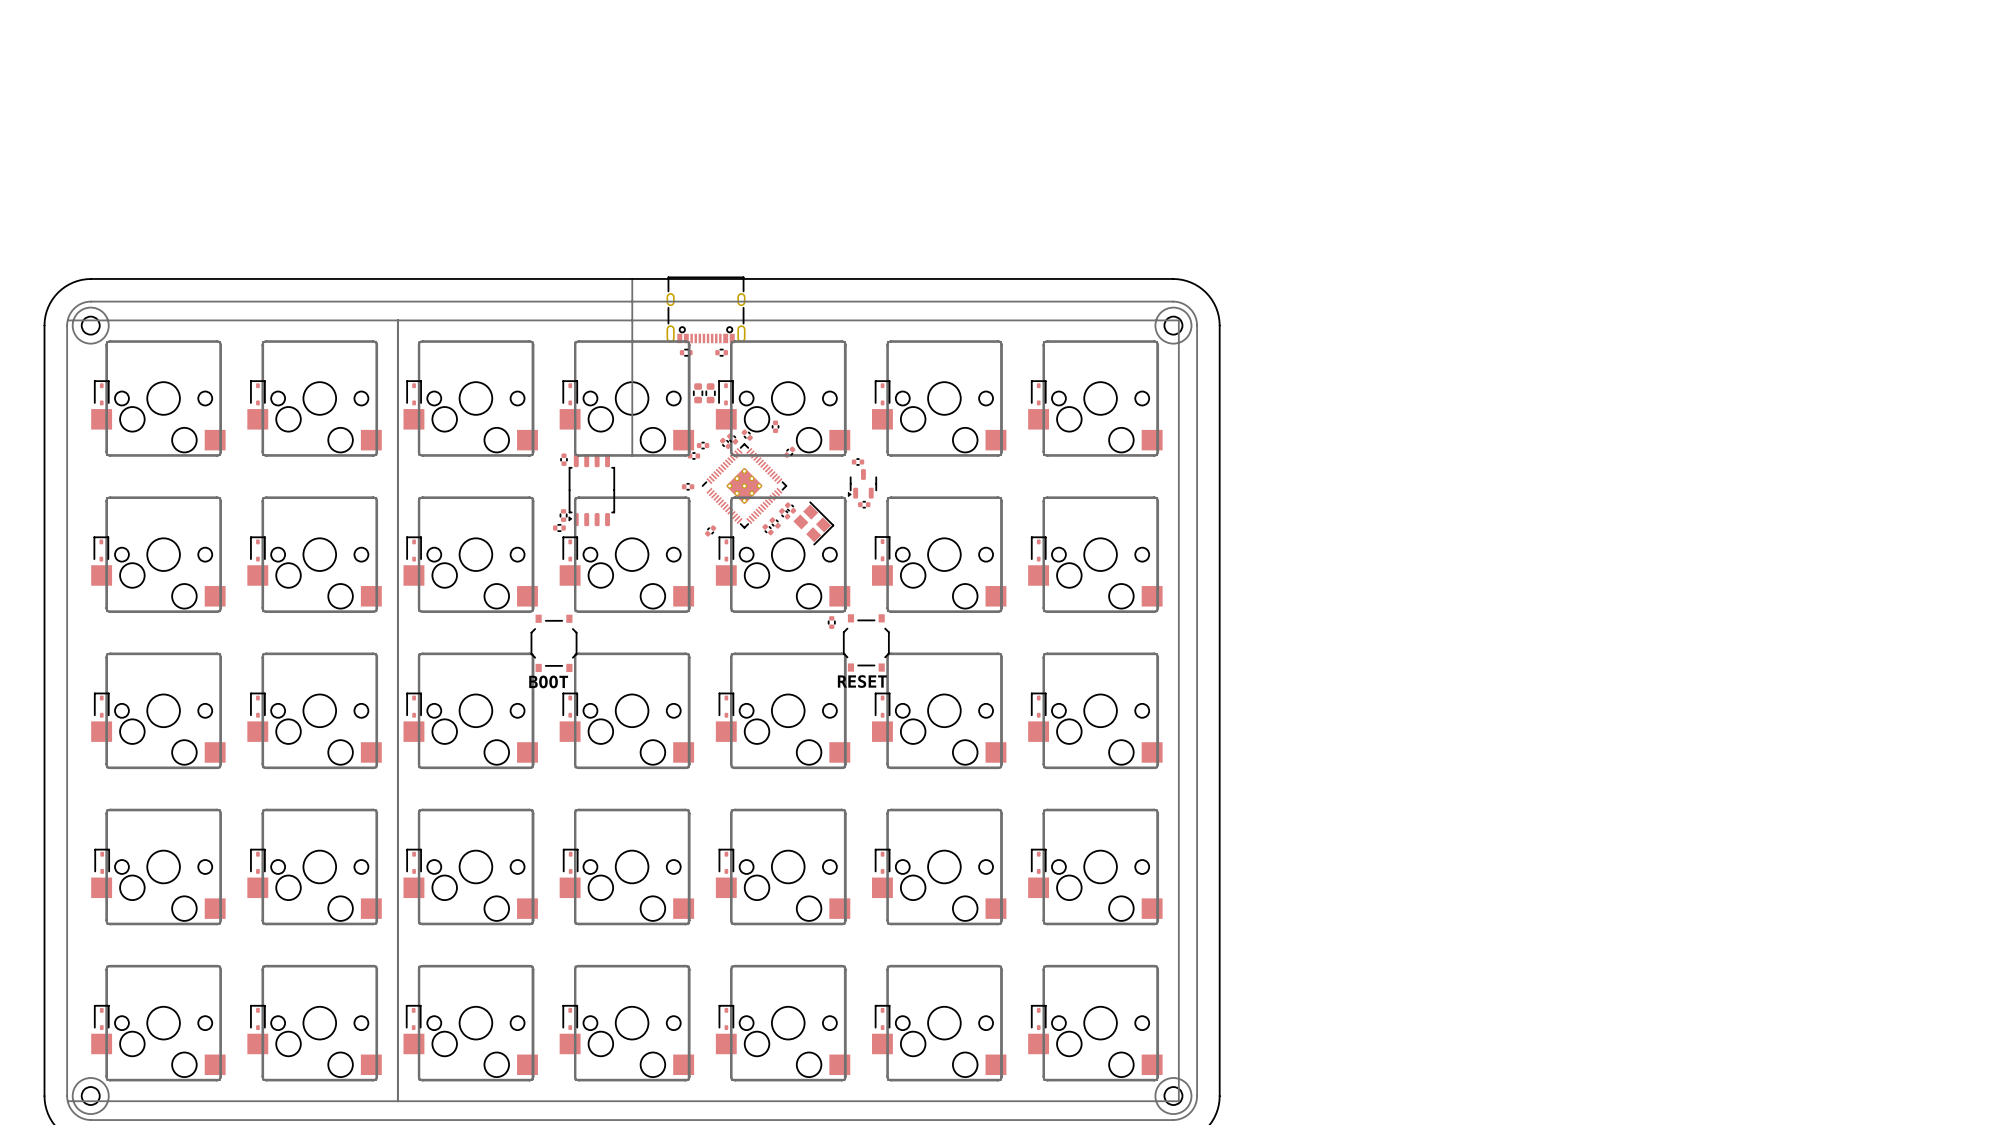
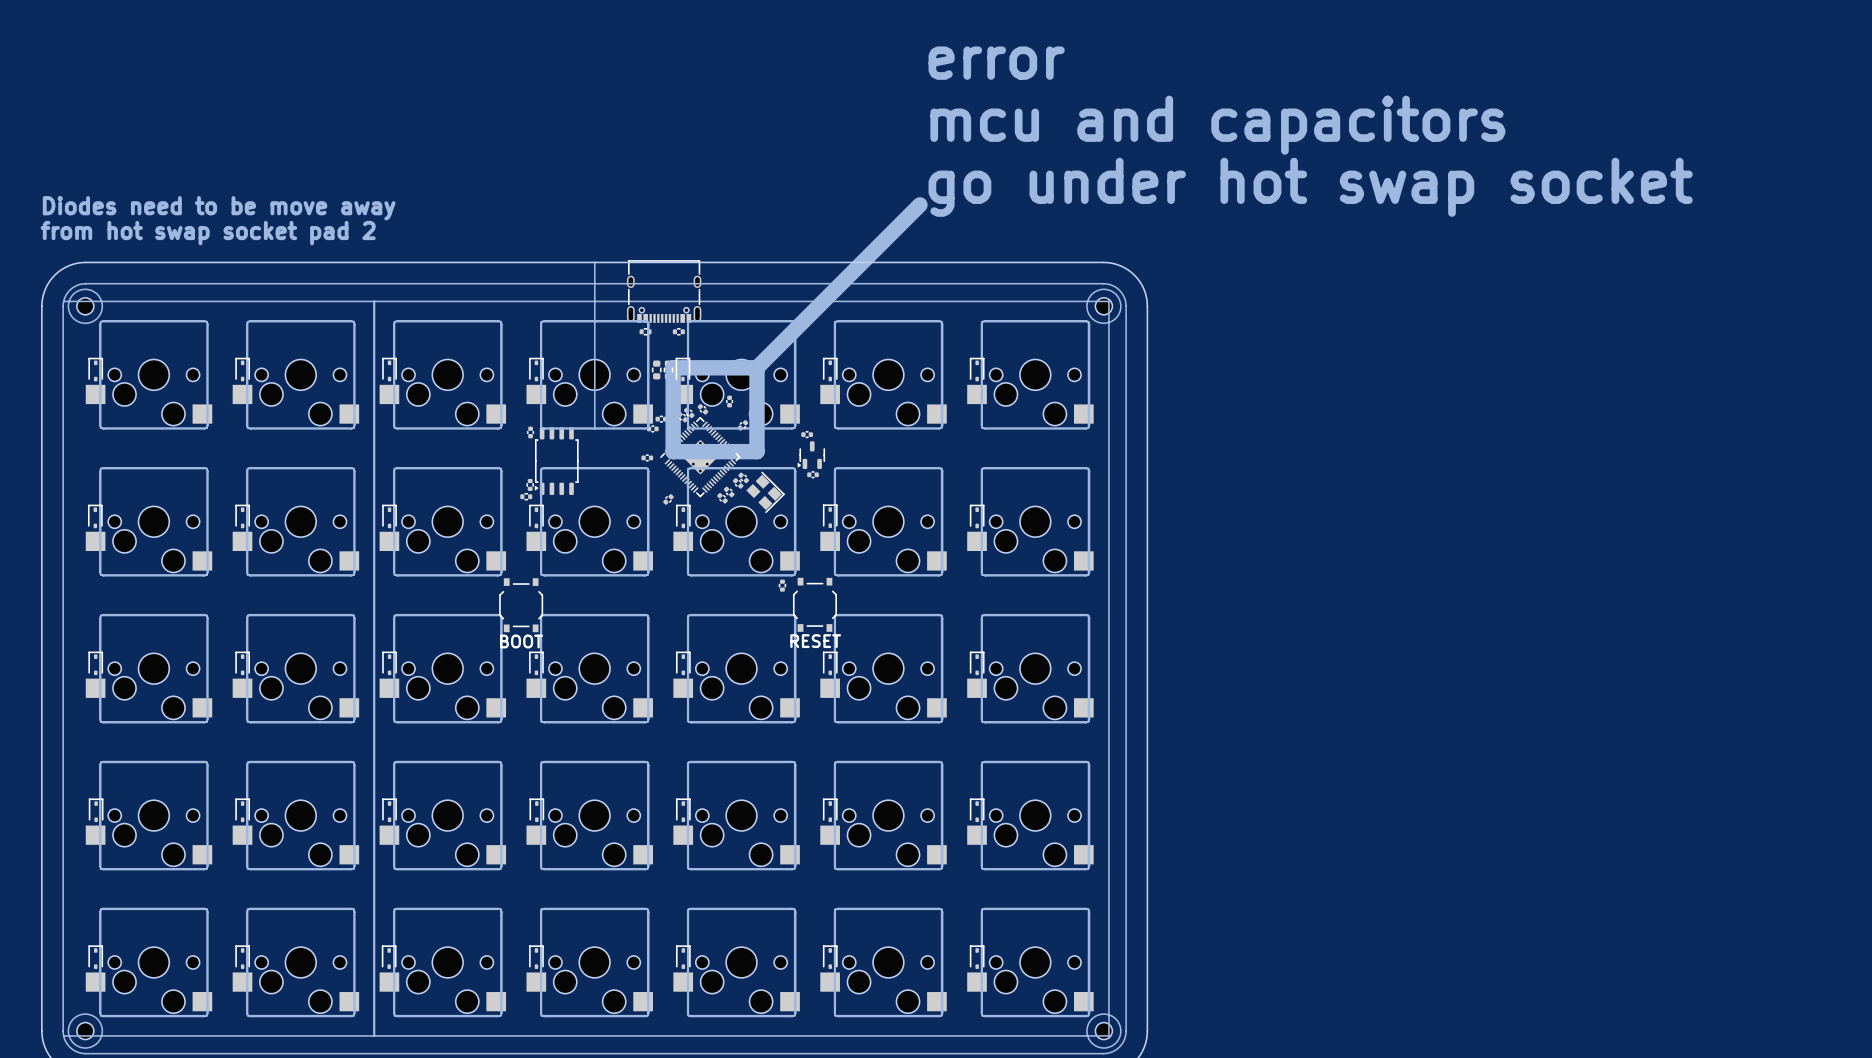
text: none -> error (996, 63)
text: none -> mcu and capacitors (1217, 125)
text: none -> go under hot swap socket (1310, 187)
line: none -> (919, 204) (757, 367)
text: none -> Diodes need to be move away (219, 208)
text: none -> from hot swap socket pad 2 (208, 233)
line: none -> (757, 367) (673, 367) (673, 451) (757, 451) (757, 367)

